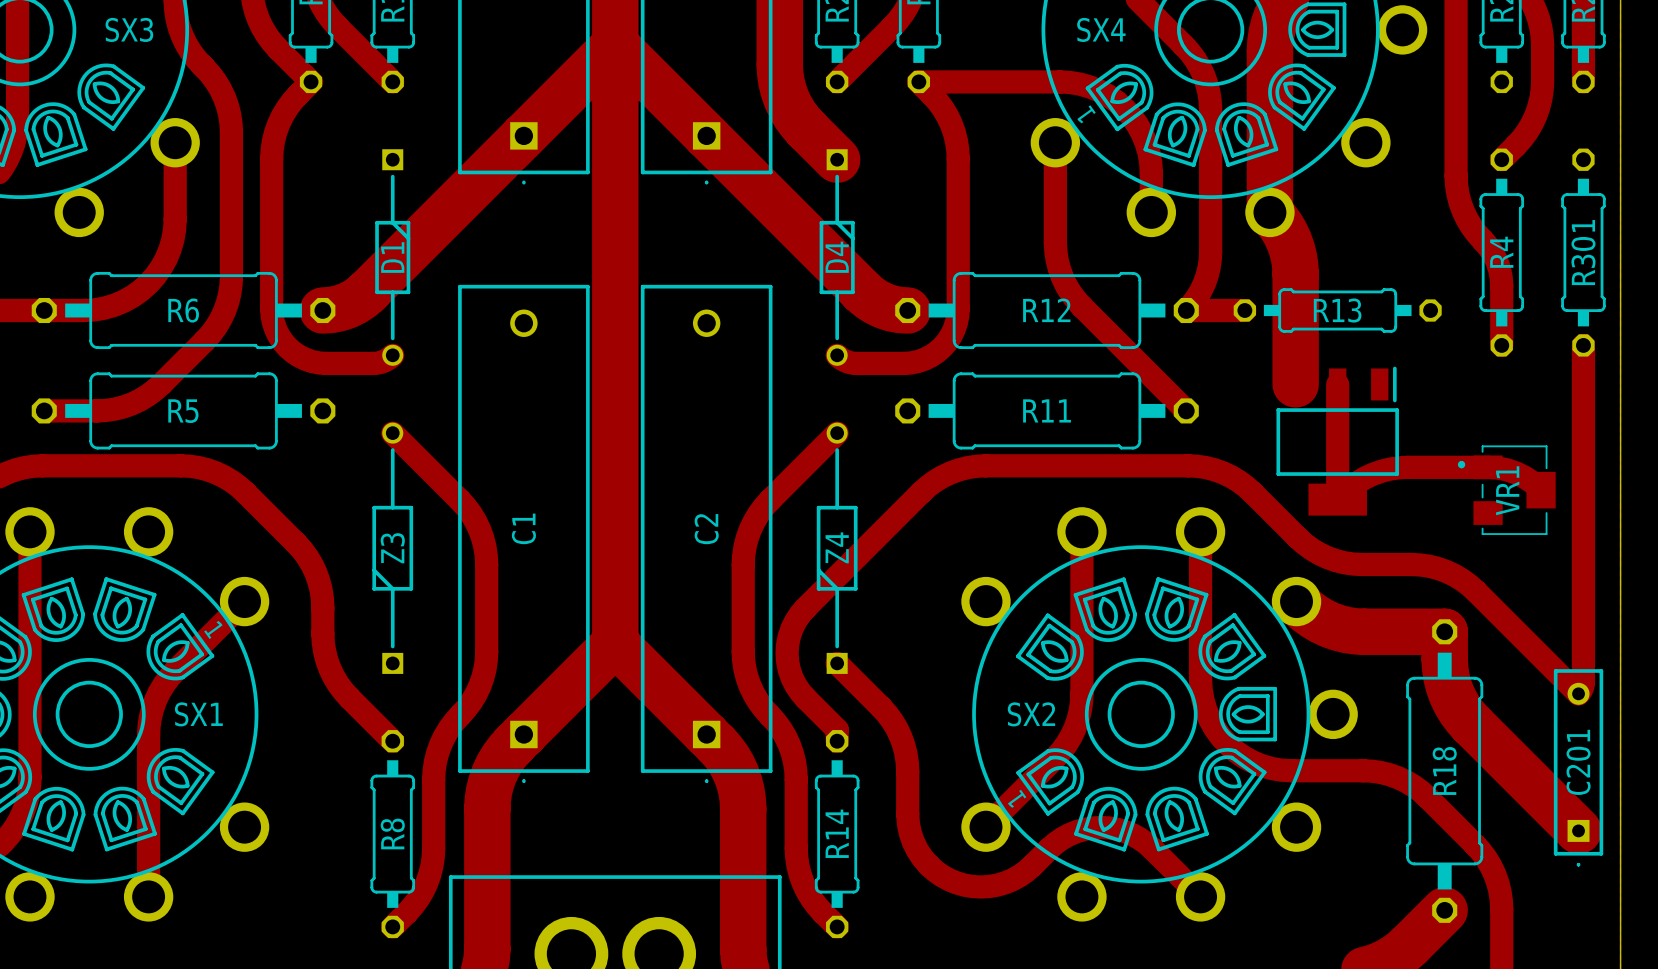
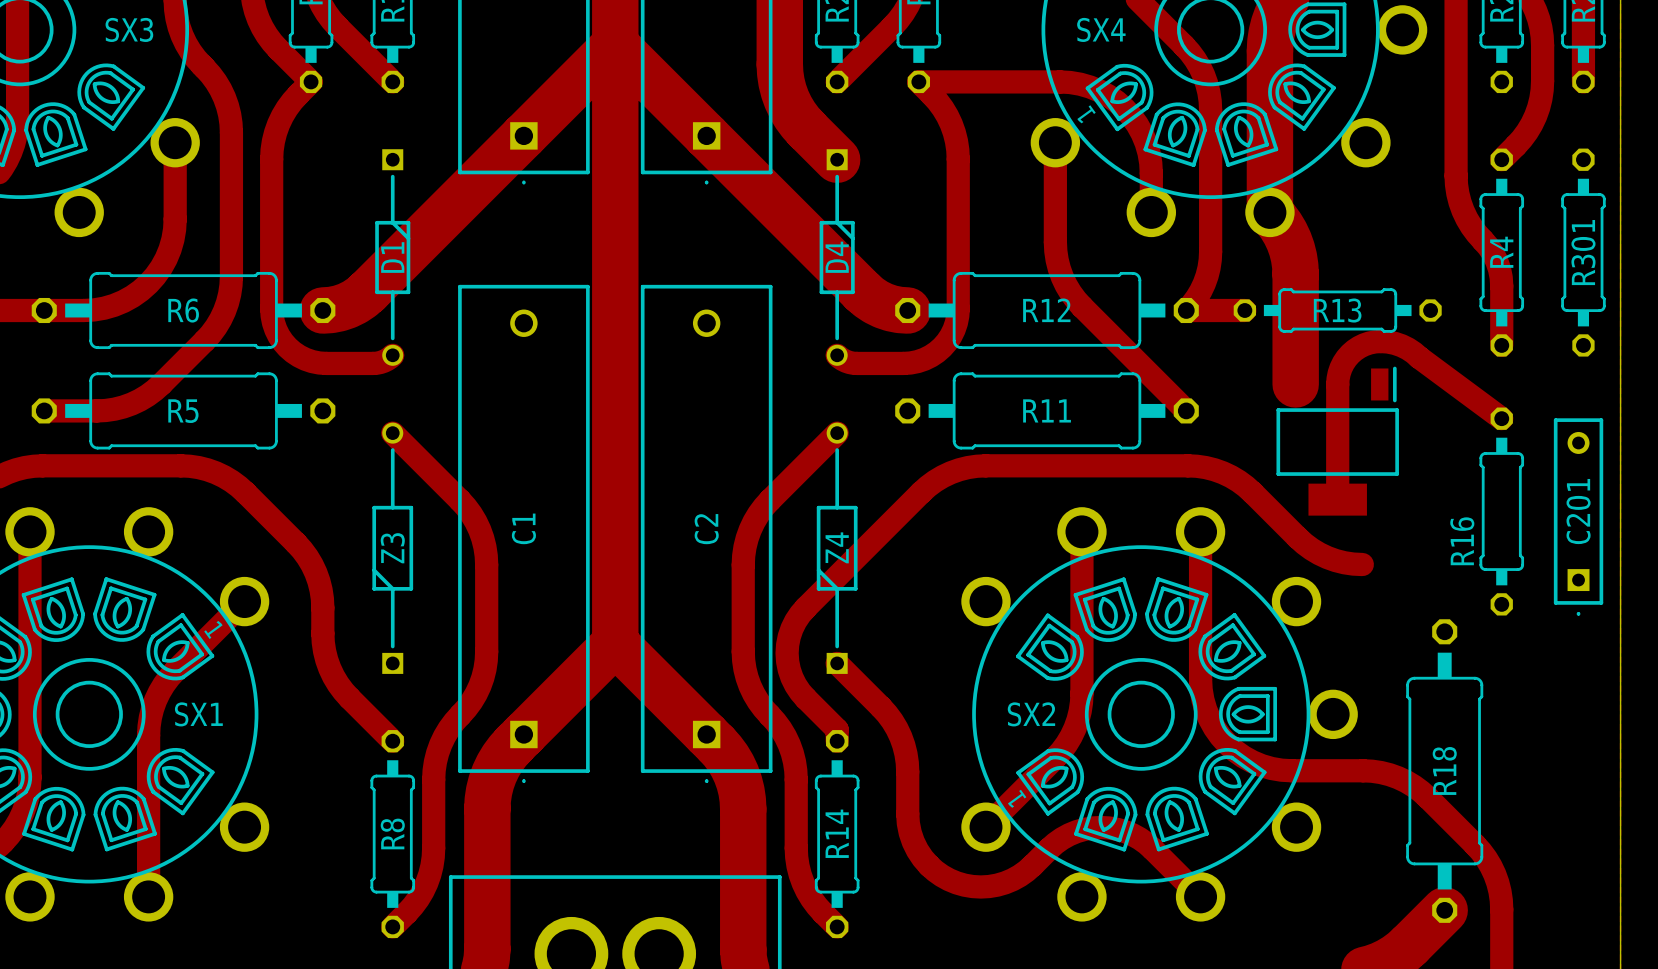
track: (1583, 345) (1583, 681) (1578, 693) (1475, 591) (1454, 575) (1437, 568) (1420, 564) (1362, 564) -> none
track: none -> (1337, 384) (1340, 368) (1354, 350) (1375, 341) (1394, 343) (1413, 352) (1501, 418)
VR1: (1506, 490) -> none
track: (1541, 490) (1524, 477) (1497, 467) (1407, 467) (1390, 469) (1372, 474) (1357, 482) (1337, 499) -> none
R16: none -> (1501, 511)
track: (1296, 601) (1321, 620) (1346, 630) (1444, 631) (1446, 677) (1451, 694) (1460, 710) (1471, 723) (1578, 830) -> none
C2O1 position: (1578, 767) -> (1578, 517)

